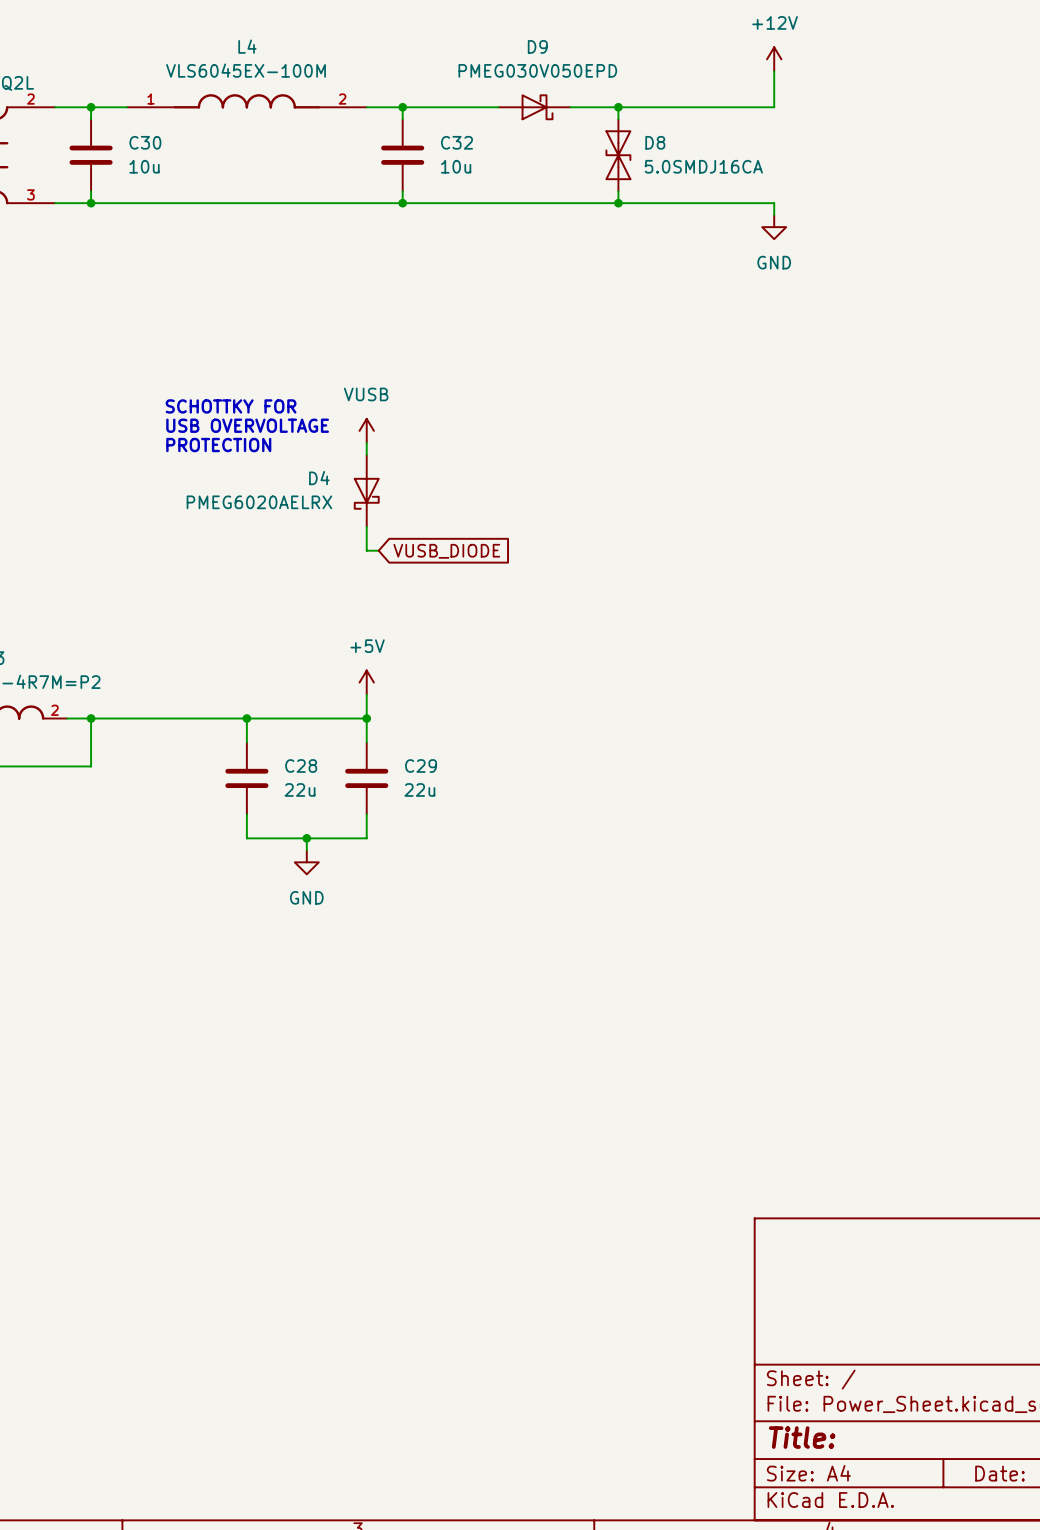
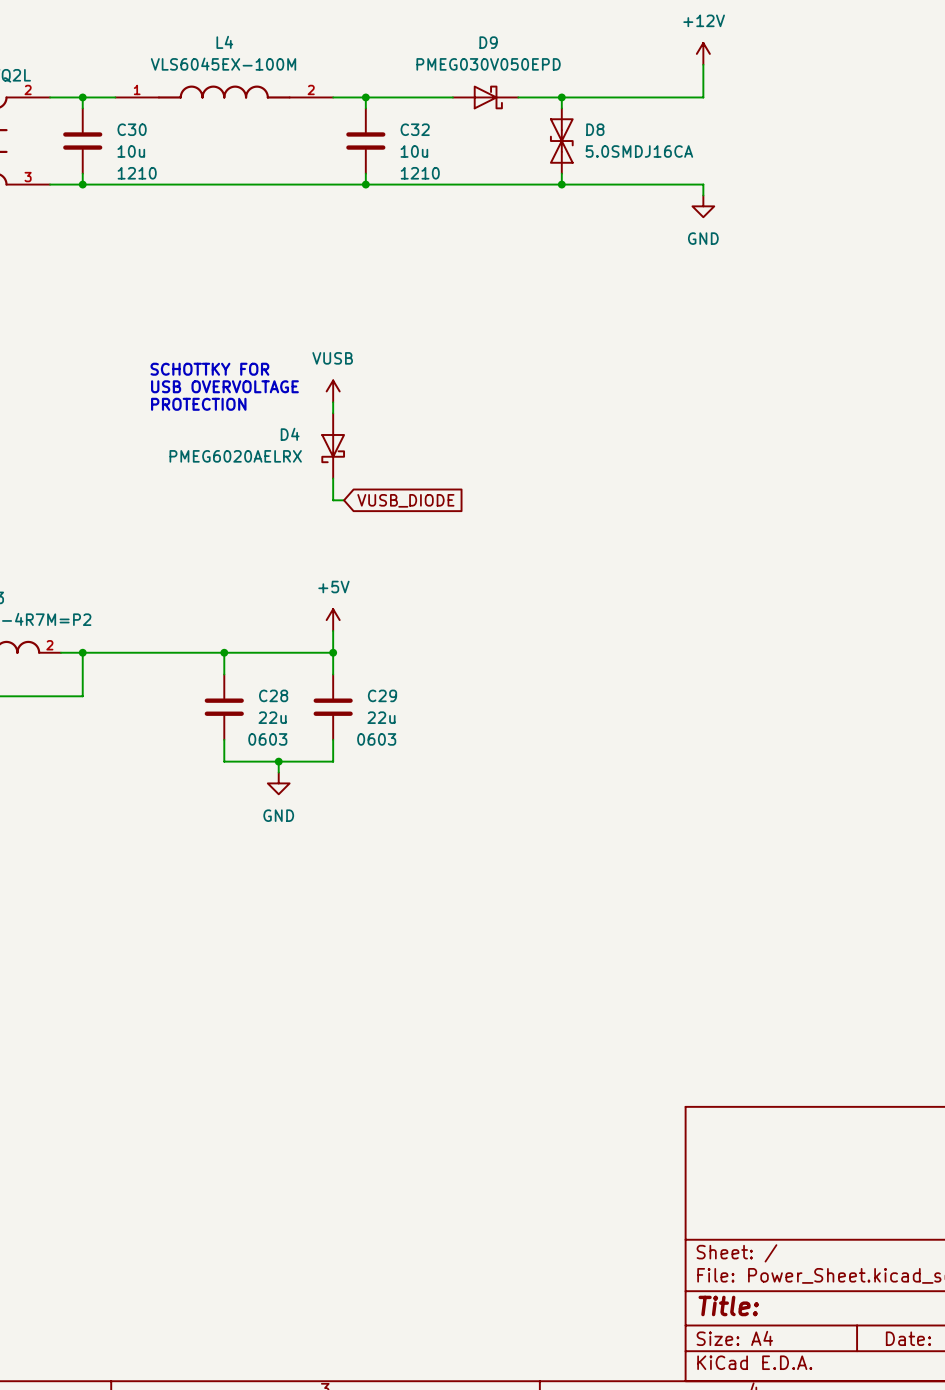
C30 text: none -> 1210 (137, 173)
C32 text: none -> 1210 (420, 173)
C28 text: none -> 0603 (267, 739)
C29 text: none -> 0603 (376, 739)

